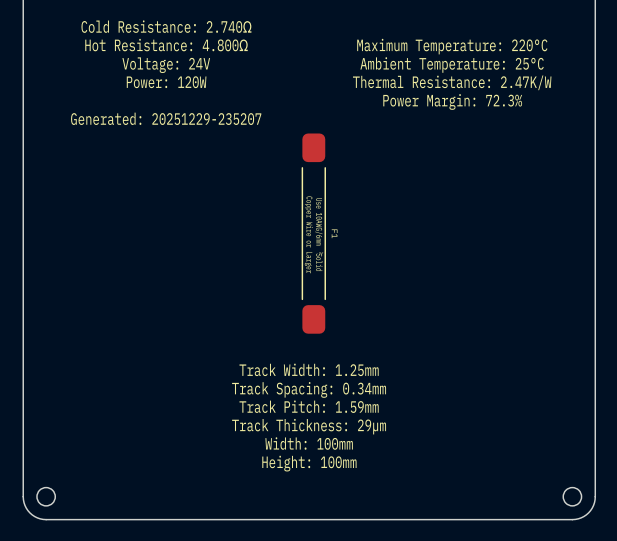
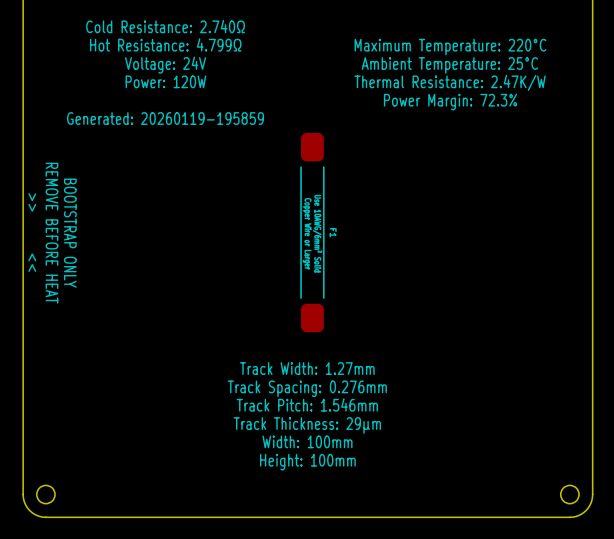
text: Hot Resistance: 4.800Ω (166, 45) -> Hot Resistance: 4.799Ω (165, 44)
text: Generated: 20251229-235207 (166, 118) -> Generated: 20260119-195859 (165, 118)
text: none -> >> << (32, 232)
text: none -> REMOVE BEFORE HEAT (51, 233)
text: none -> BOOTSTRAP ONLY (70, 233)
text: Track Width: 1.25mm (309, 369) -> Track Width: 1.27mm (307, 368)
text: Track Spacing: 0.34mm (309, 389) -> Track Spacing: 0.276mm (307, 388)
text: Track Pitch: 1.59mm (309, 406) -> Track Pitch: 1.546mm (307, 404)

